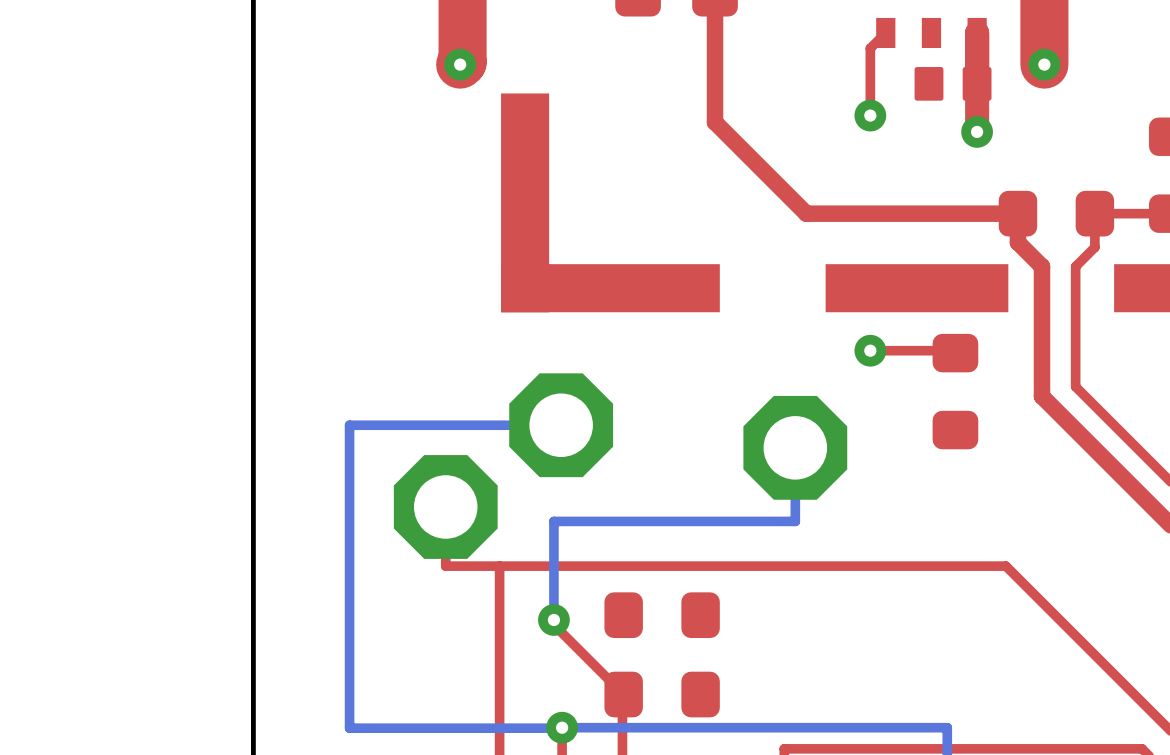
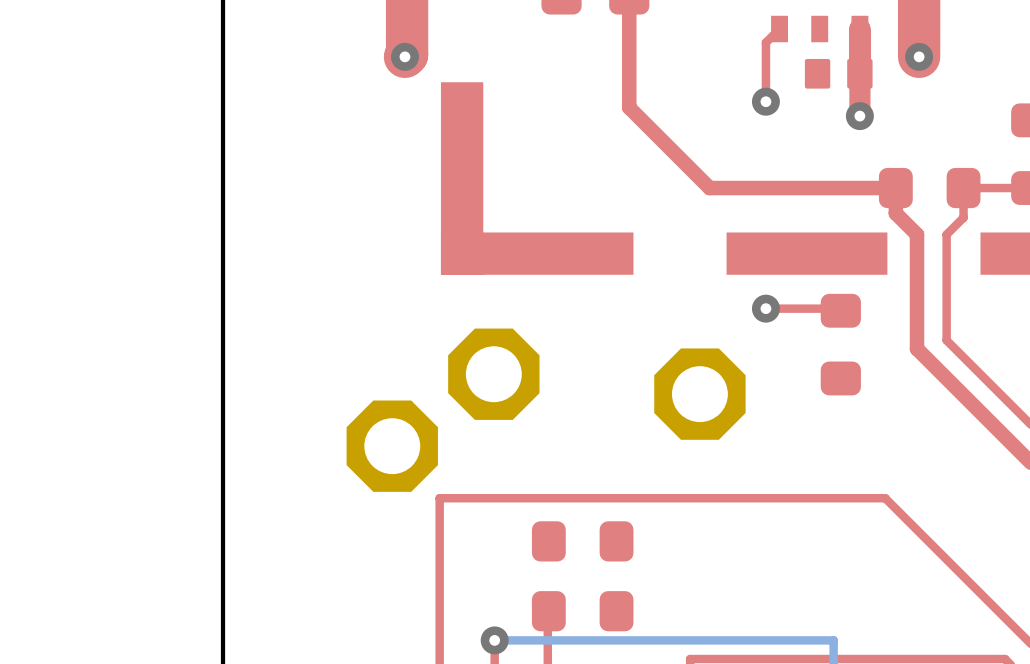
bottom track: (561, 425) (349, 425) (349, 728) (562, 728) -> none
bottom track: (795, 447) (795, 521) (553, 521) (553, 619) -> none
top track: (445, 506) (445, 566) (499, 566) -> none
top track: (553, 619) (553, 624) (623, 694) -> none
via: (553, 619) -> none

